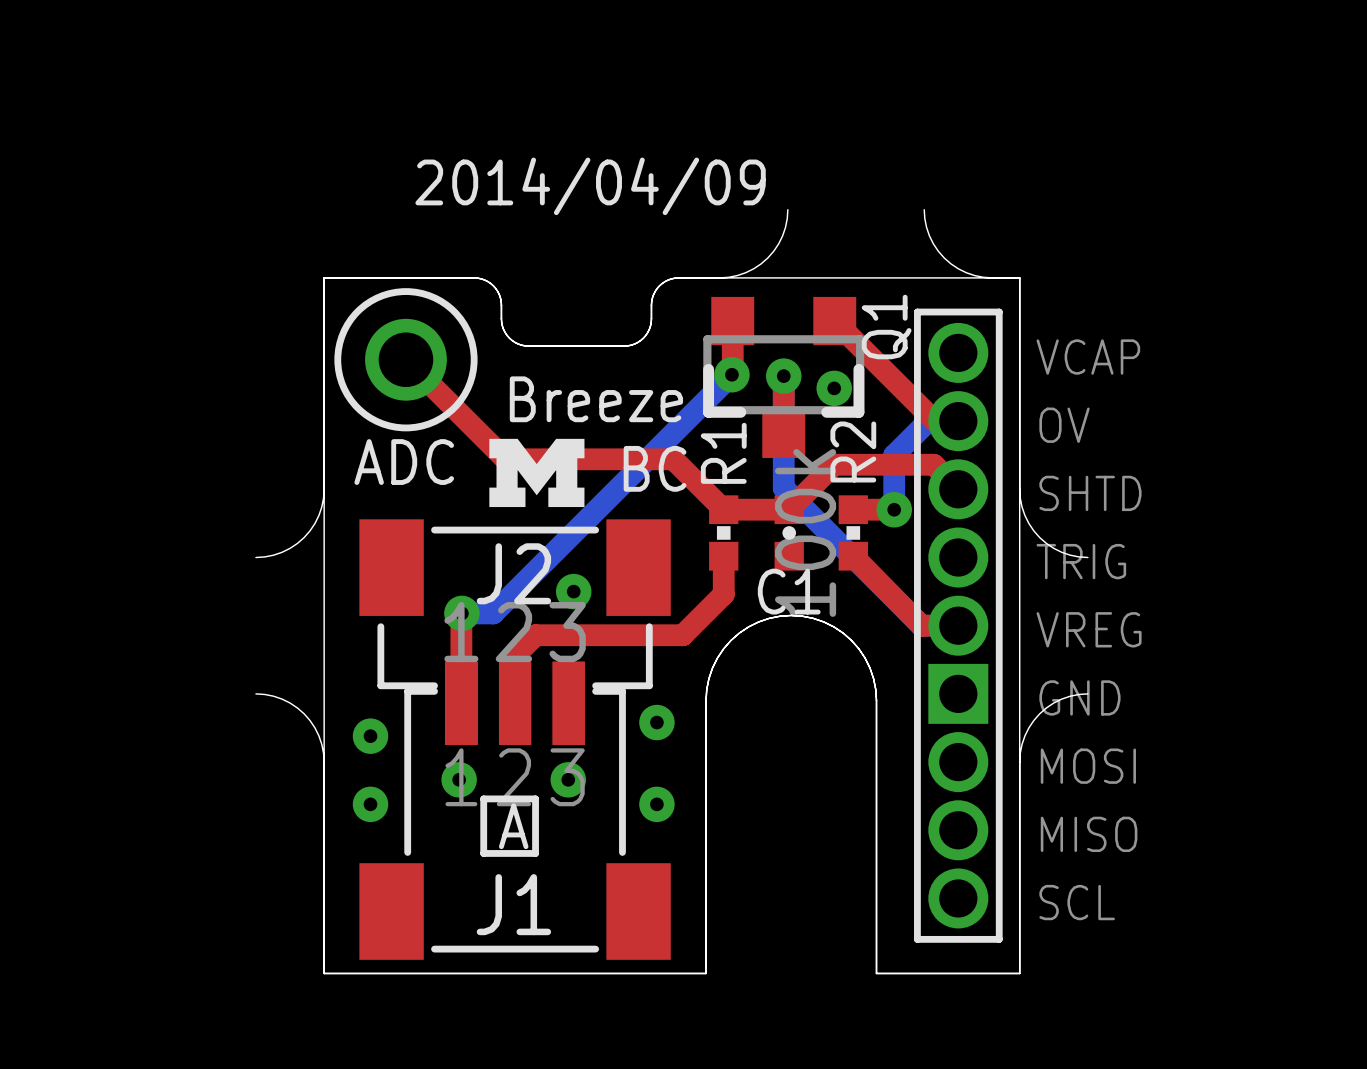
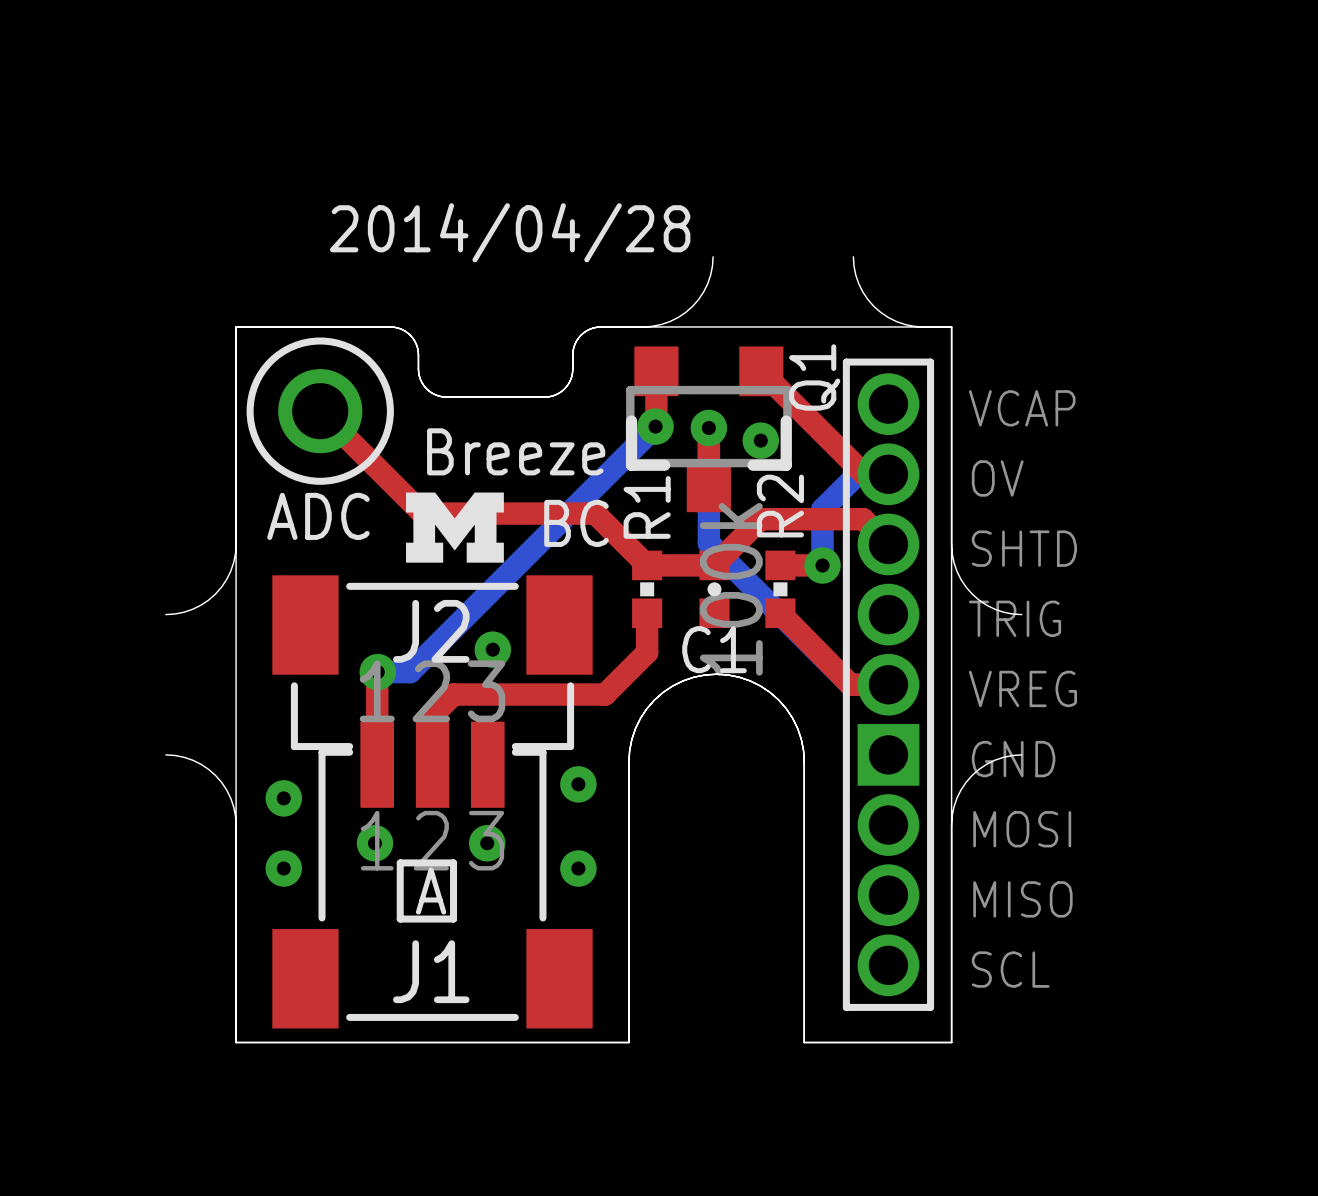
text: 2014/04/09 (590, 186) -> 2014/04/28 (510, 232)

